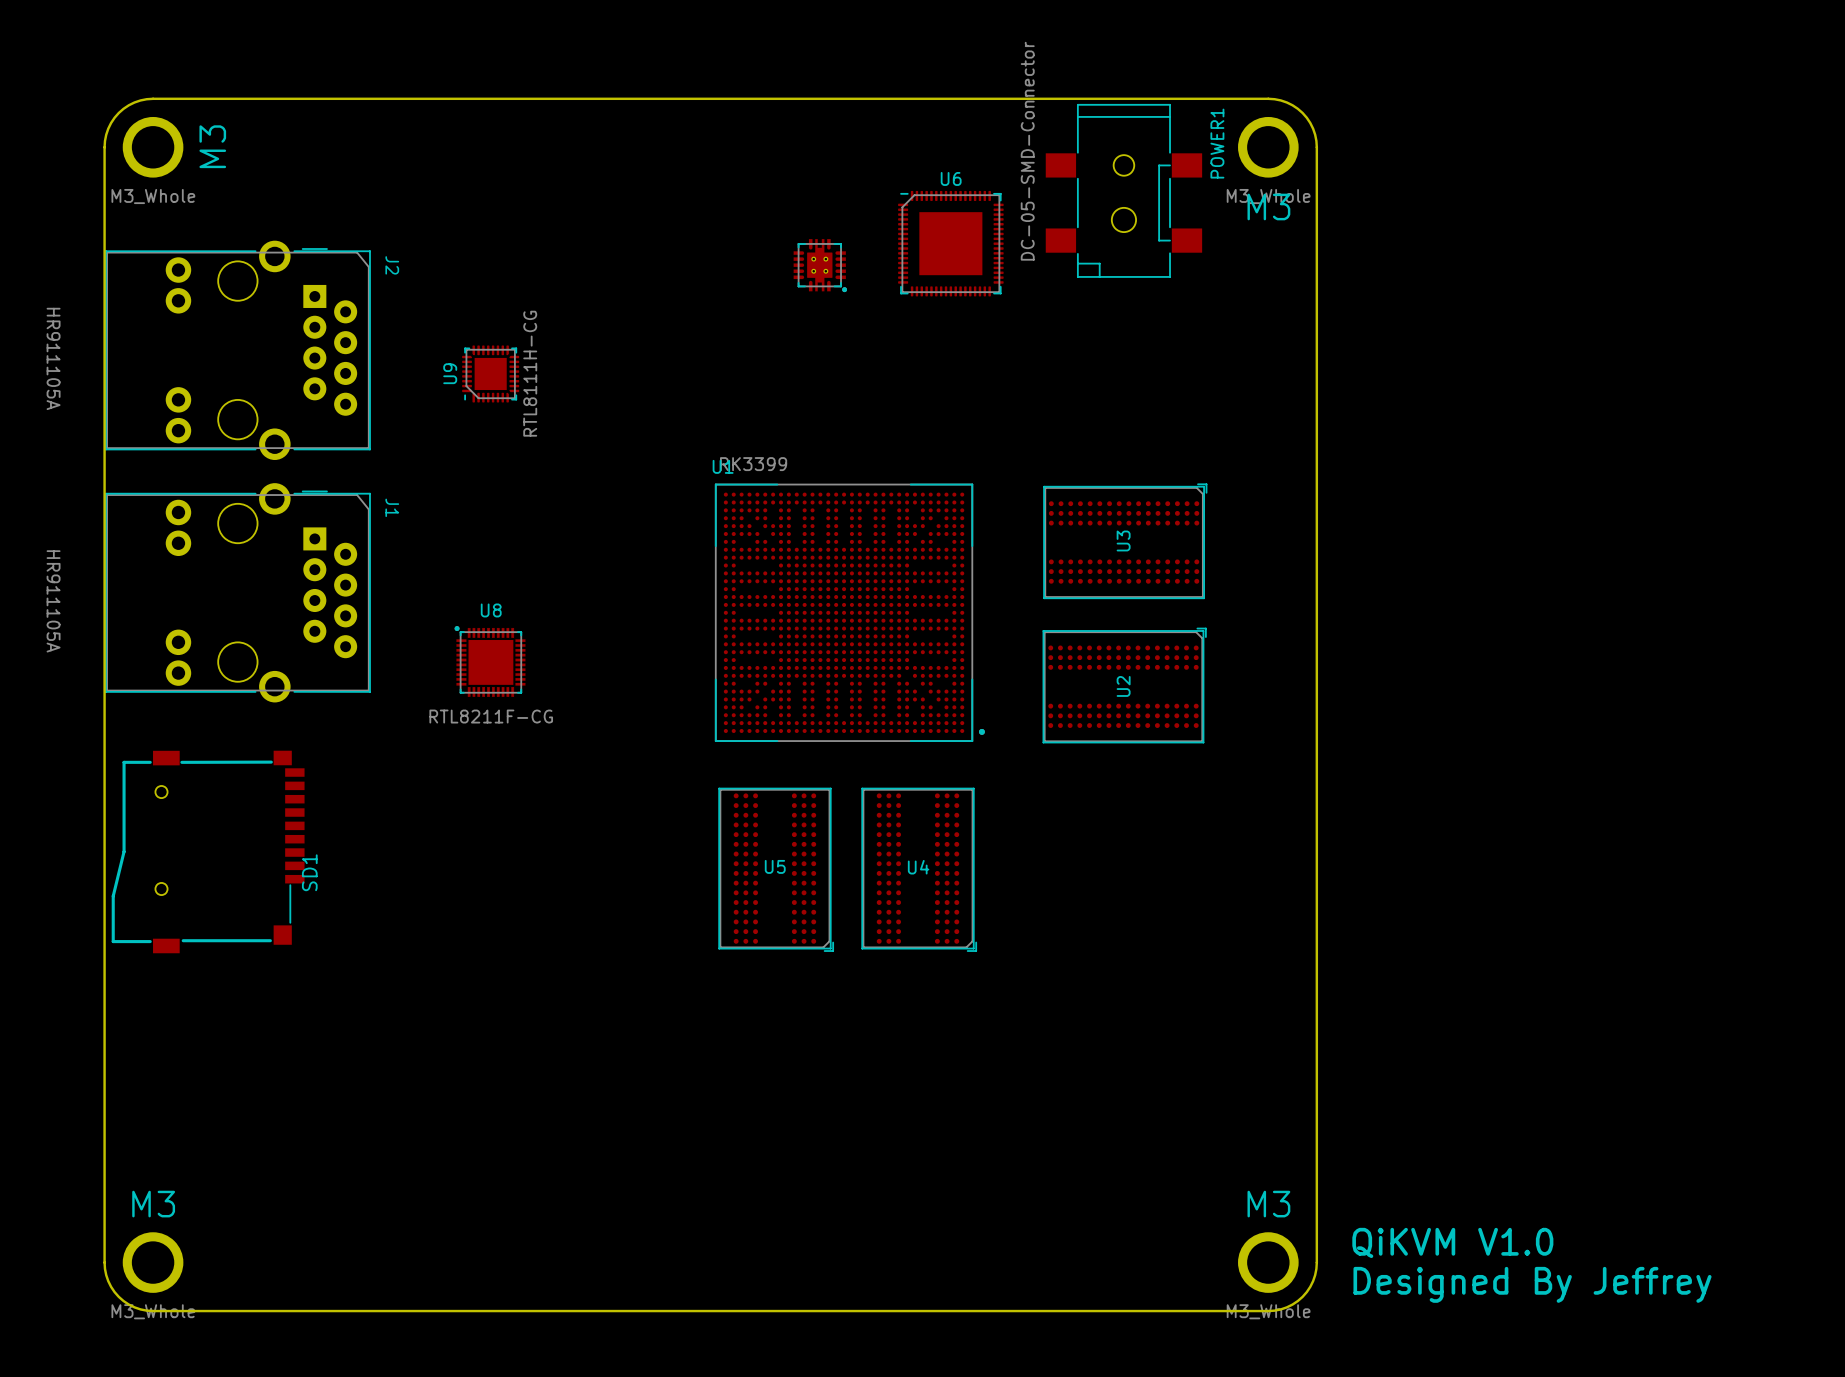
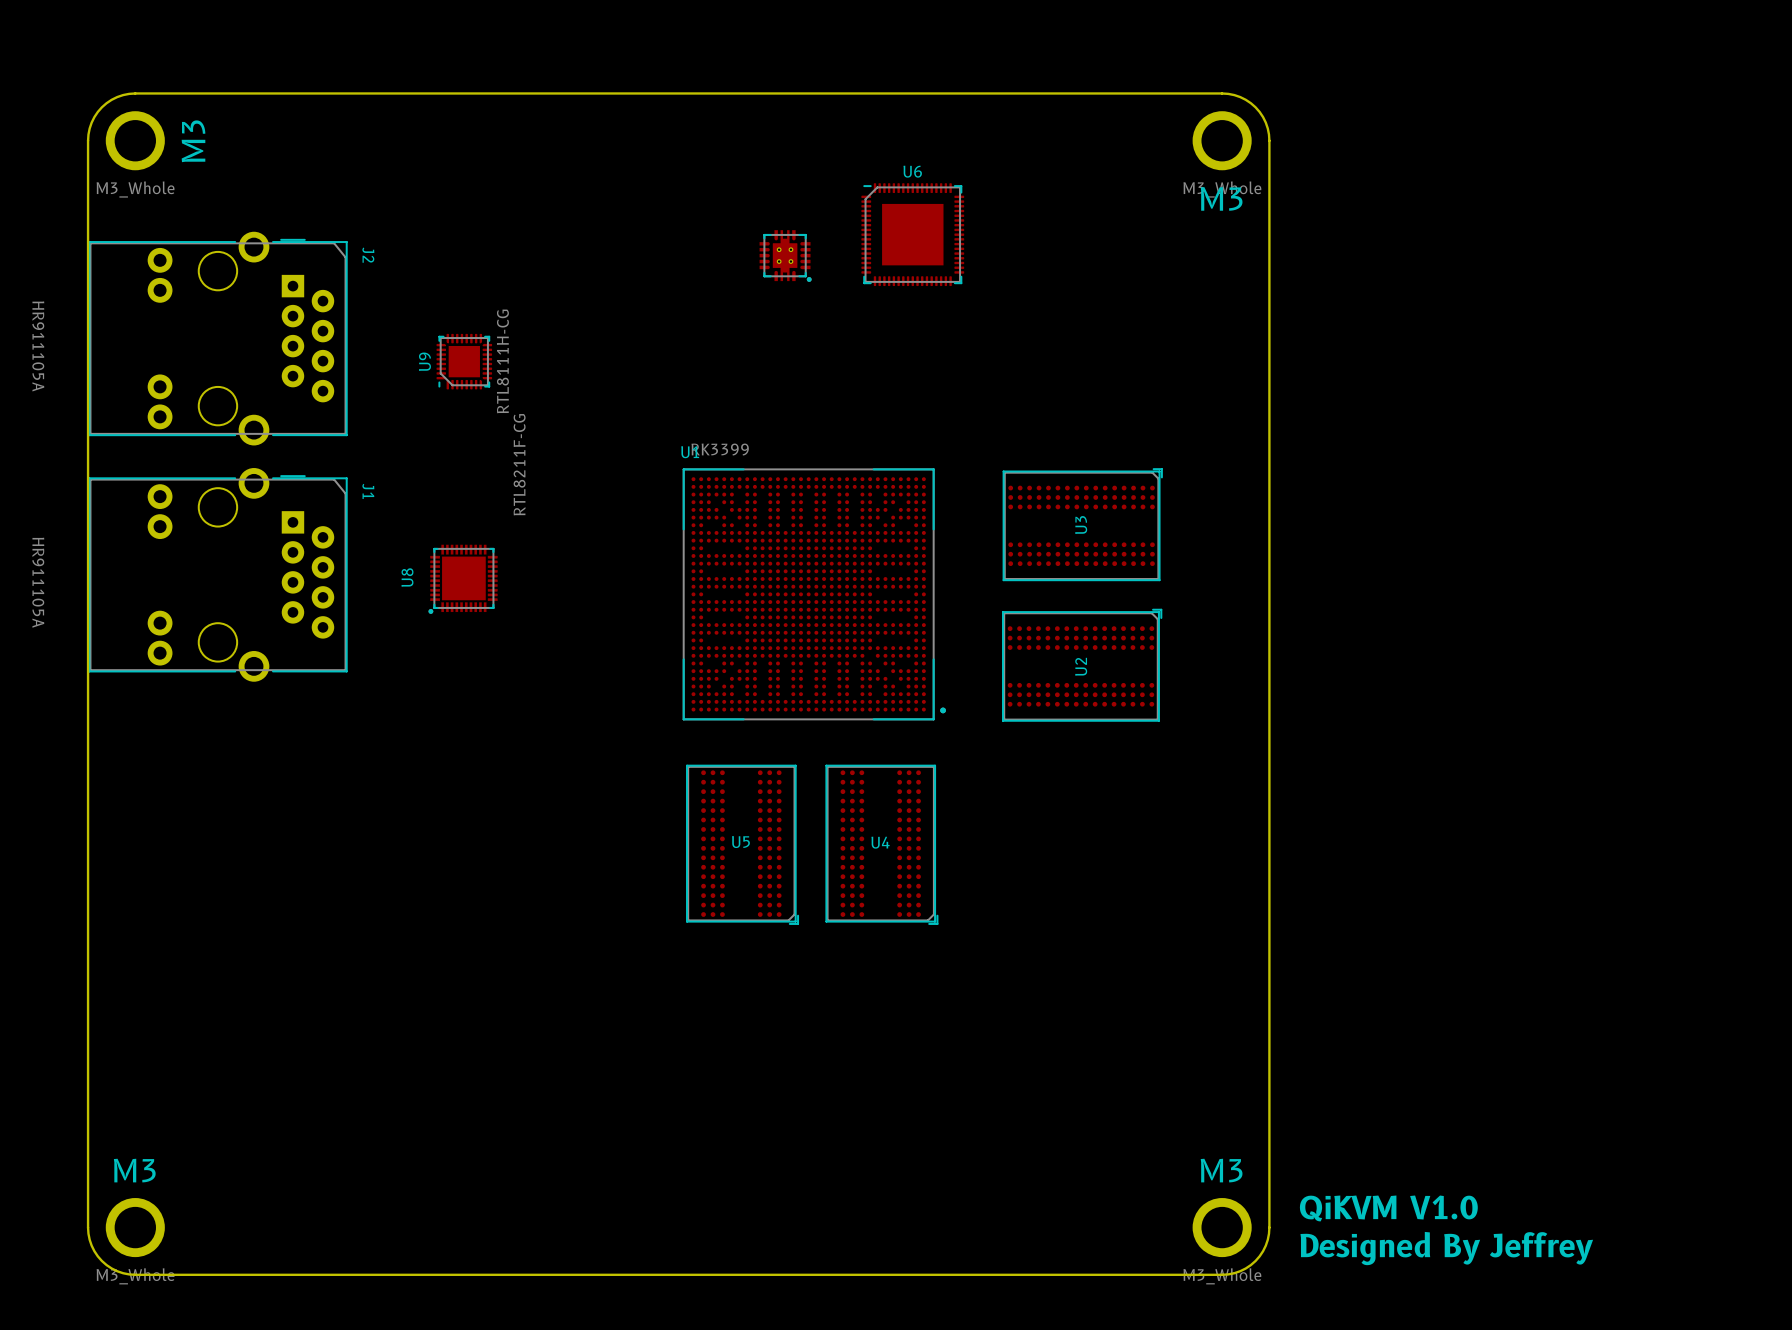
POWER1: DC-05-SMD-Connector (1123, 190) -> none
U8 rotation: 0° (490, 661) -> 90° counterclockwise (463, 579)
U8 position: (490, 661) -> (463, 579)
U8 value position: RTL8211F-CG (491, 716) -> RTL8211F-CG (519, 464)
SD1: (208, 851) -> none

